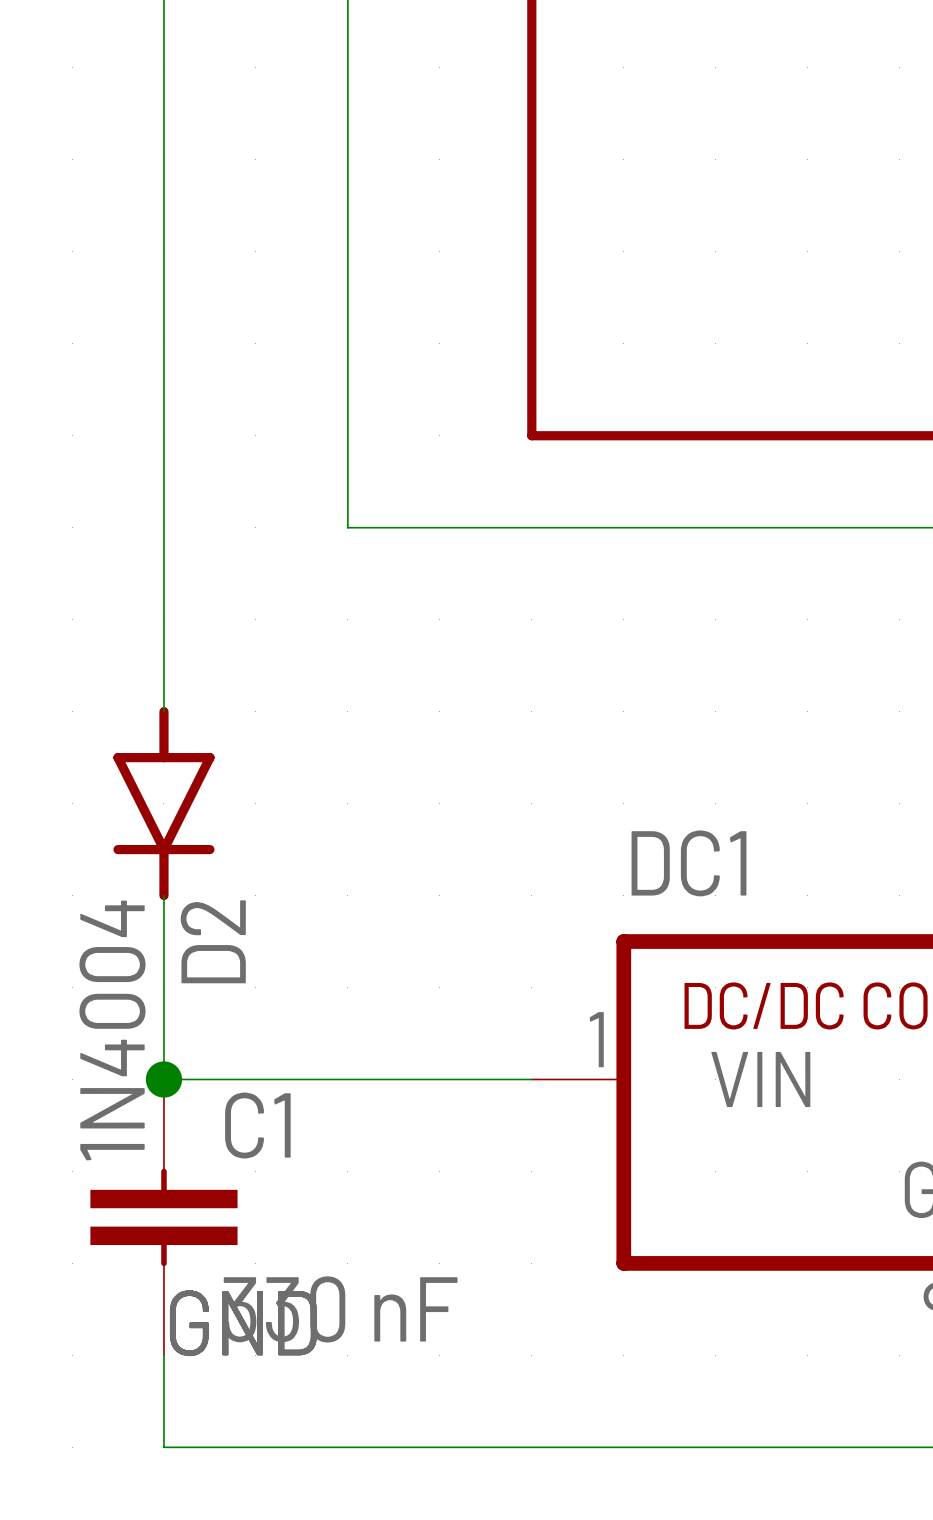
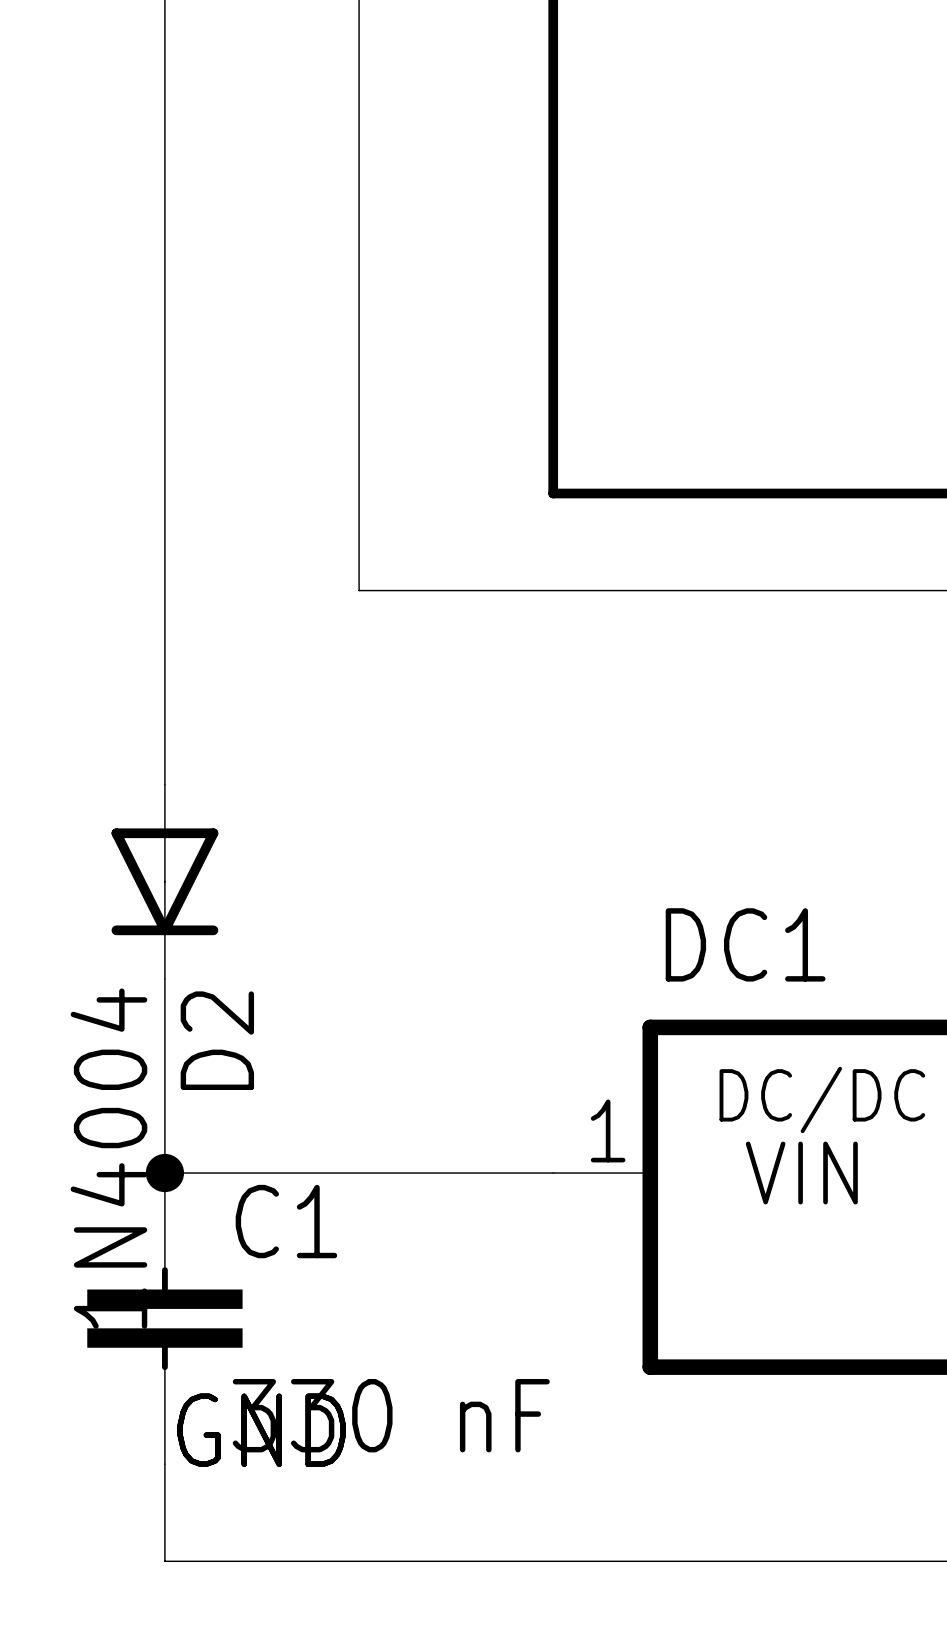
D2 symbol: [113, 707, 215, 901] -> [111, 784, 219, 979]

